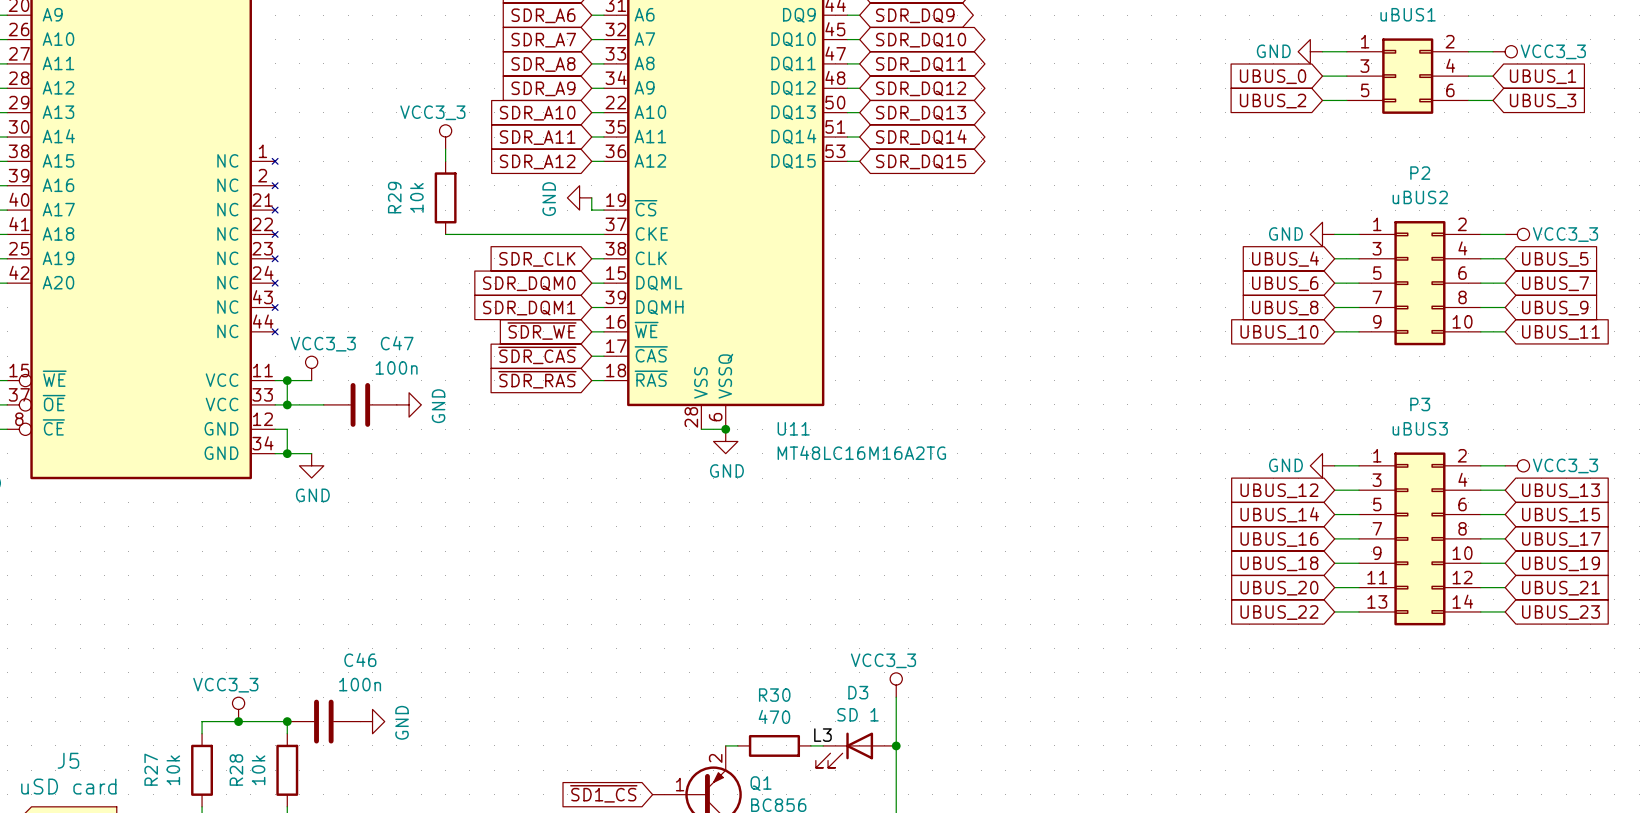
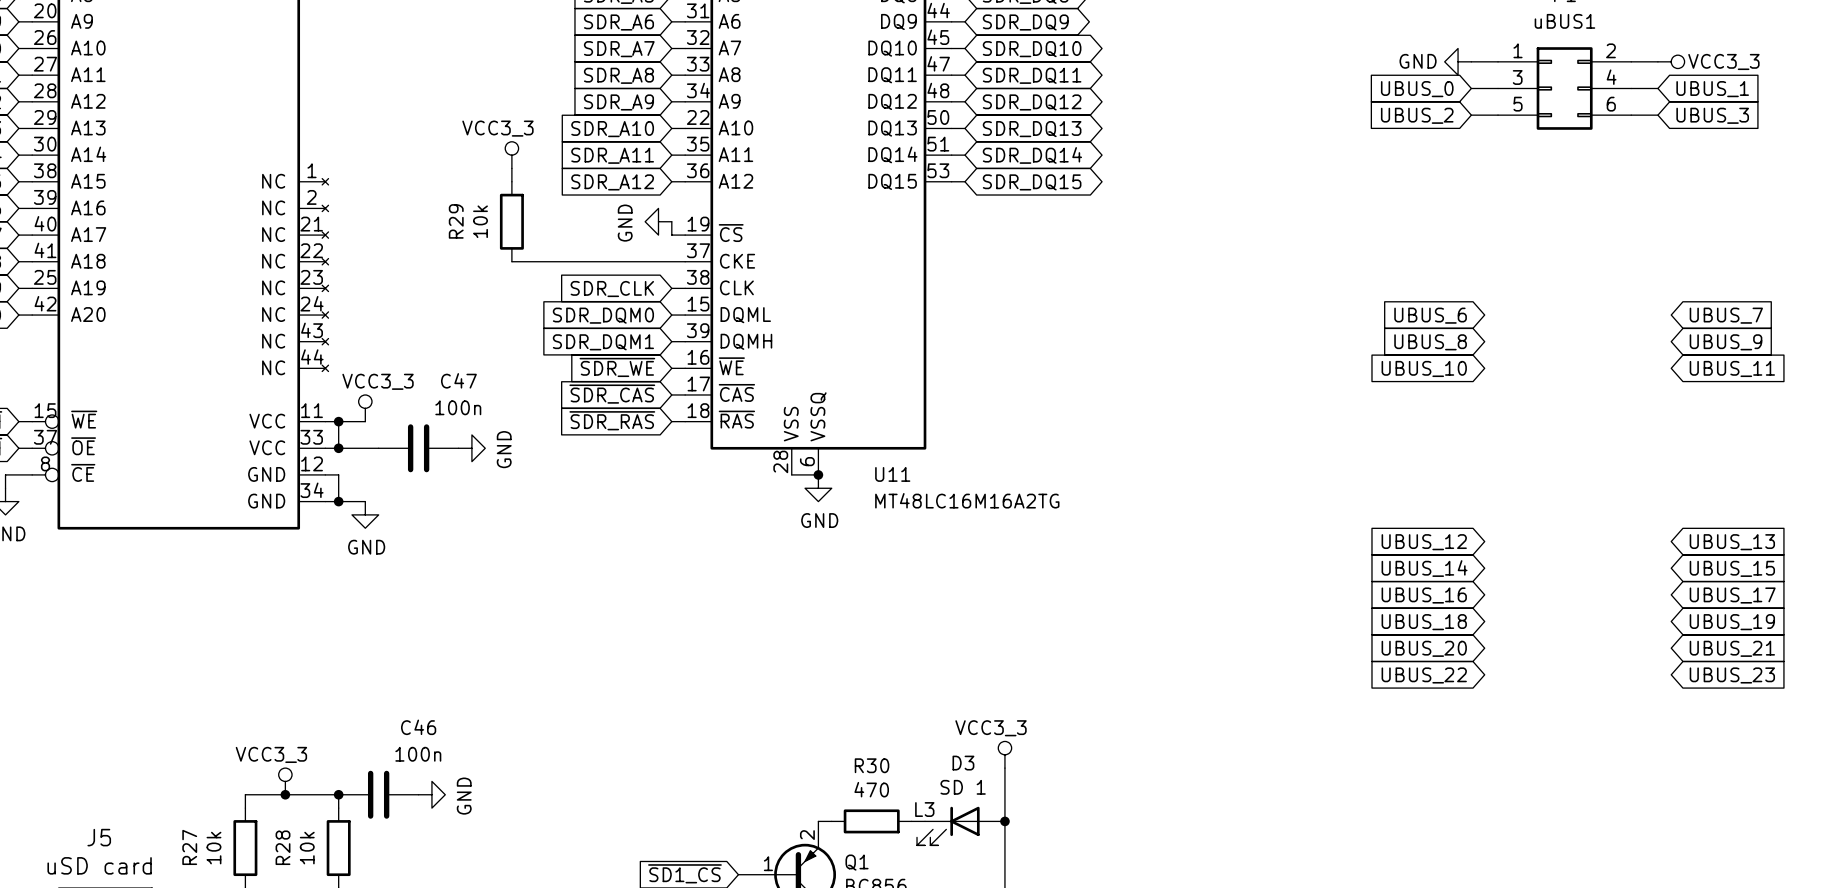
power symbol: GND (1322, 234) -> none
wire: (1334, 234) (1359, 234) -> none
wire: (1480, 234) (1505, 234) -> none
power symbol: VCC3_3 (1517, 234) -> none
wire: (1334, 258) (1359, 258) -> none
wire: (1480, 258) (1505, 258) -> none
global label: UBUS_4 (1285, 259) -> none
global label: UBUS_5 (1555, 259) -> none
wire: (1334, 283) (1359, 283) -> none
P2: uBUS2 (1419, 283) -> none
wire: (1480, 283) (1505, 283) -> none
wire: (1334, 307) (1359, 307) -> none
wire: (1480, 307) (1505, 307) -> none
wire: (1334, 331) (1359, 331) -> none
wire: (1480, 331) (1505, 331) -> none
power symbol: GND (1322, 465) -> none
wire: (1334, 465) (1359, 465) -> none
wire: (1480, 465) (1505, 465) -> none
power symbol: VCC3_3 (1517, 465) -> none
wire: (1334, 490) (1359, 490) -> none
wire: (1480, 490) (1505, 490) -> none
wire: (1334, 514) (1359, 514) -> none
wire: (1480, 514) (1505, 514) -> none
wire: (1334, 538) (1359, 538) -> none
P3: uBUS3 (1419, 538) -> none
wire: (1480, 538) (1505, 538) -> none
wire: (1334, 563) (1359, 563) -> none
wire: (1480, 563) (1505, 563) -> none
wire: (1334, 587) (1359, 587) -> none
wire: (1480, 587) (1505, 587) -> none
wire: (1334, 611) (1359, 611) -> none
wire: (1480, 611) (1505, 611) -> none

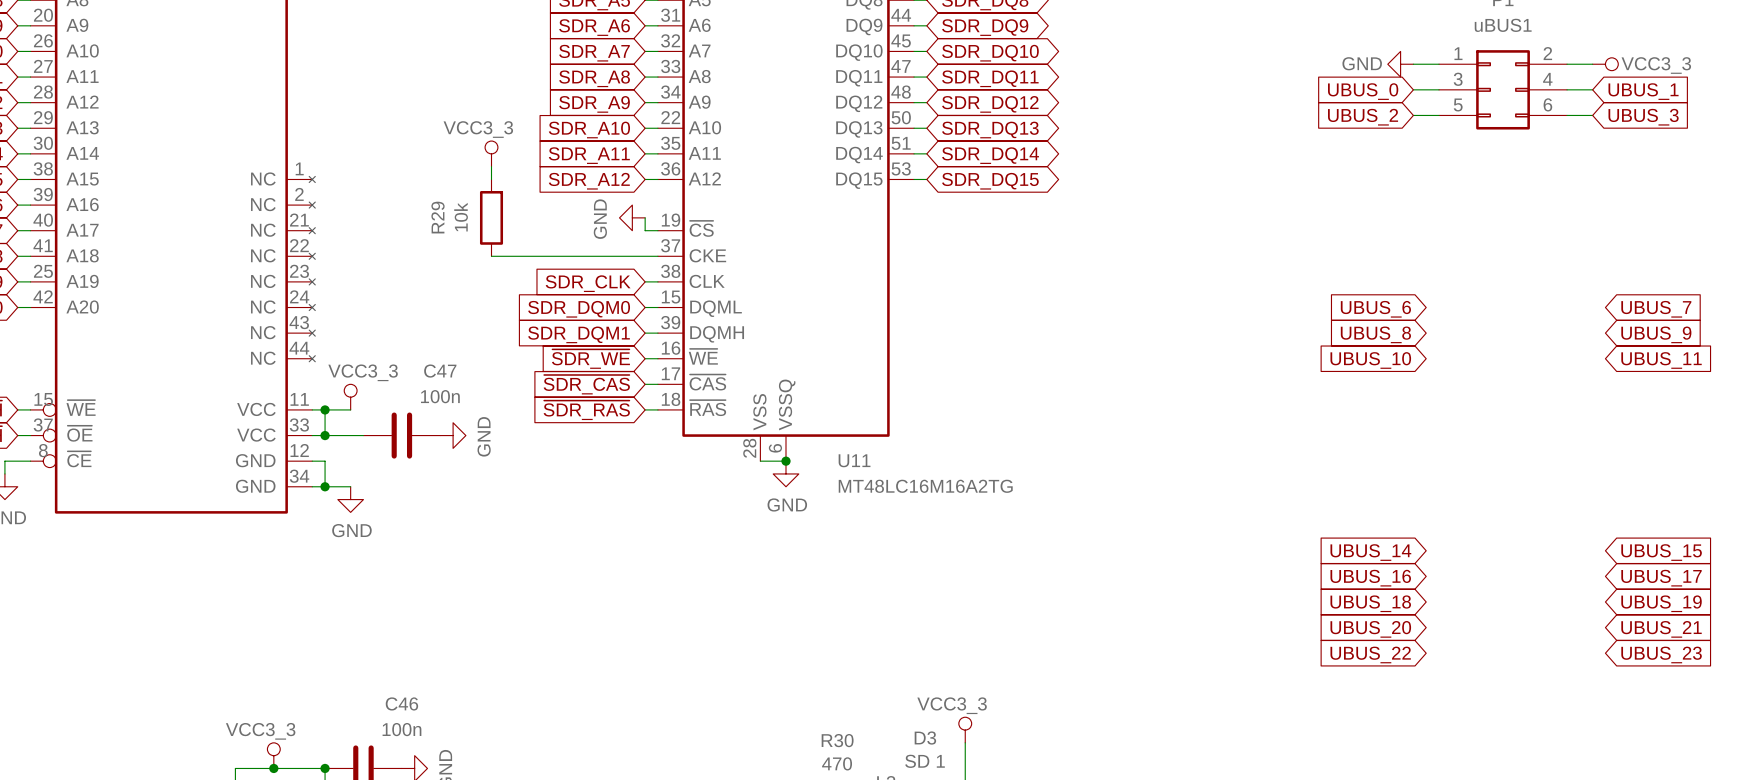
global label: UBUS_12 (1424, 542) -> none
global label: UBUS_13 (1732, 542) -> none

